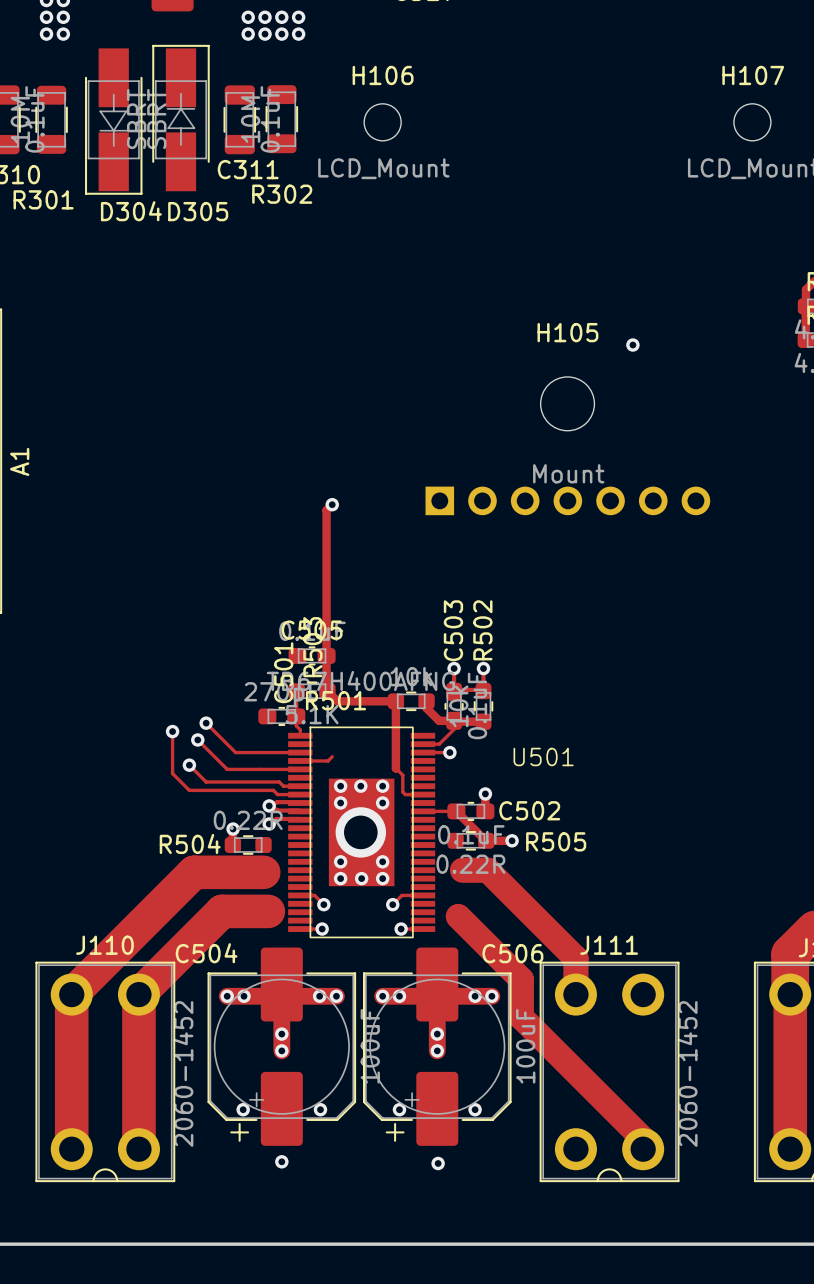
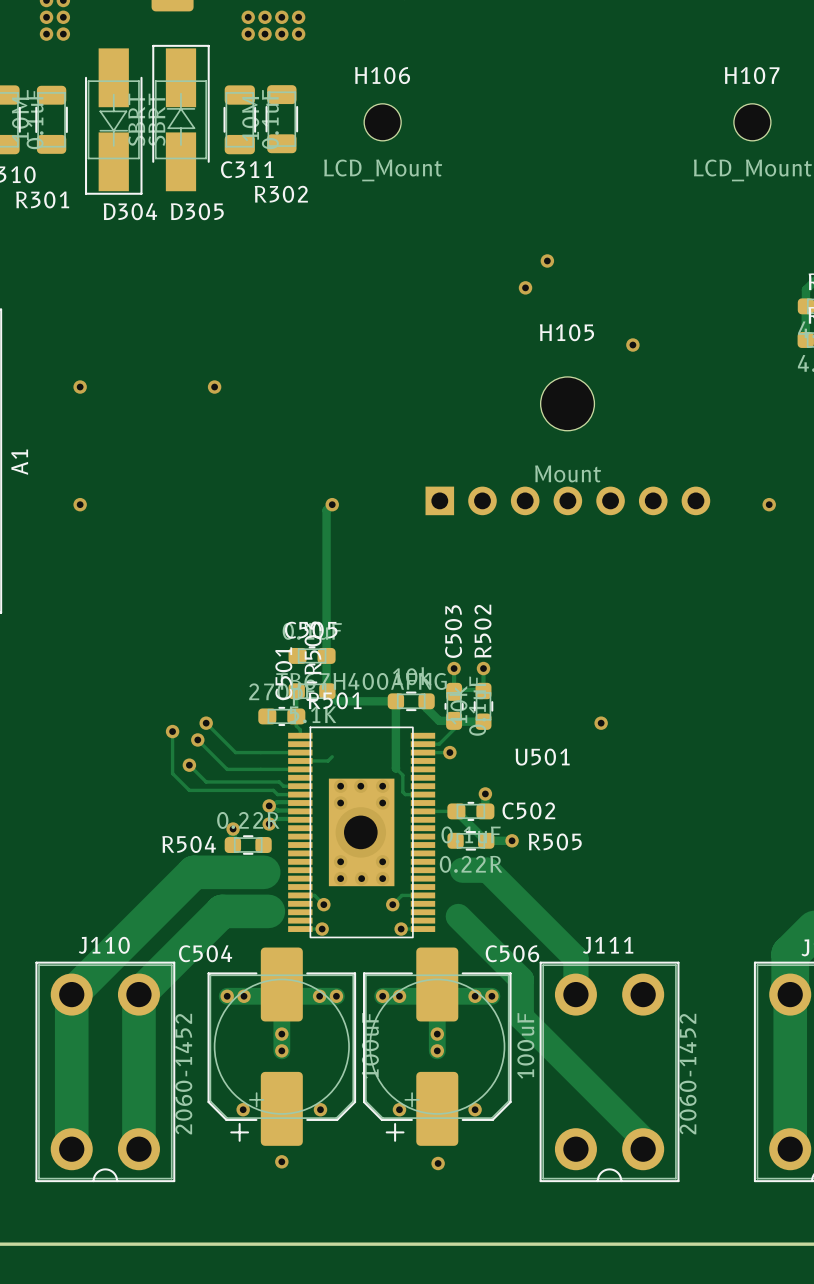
via: none -> (547, 260)
via: none -> (525, 287)
via: none -> (80, 387)
via: none -> (214, 387)
via: none -> (80, 504)
via: none -> (769, 504)
via: none -> (601, 723)

